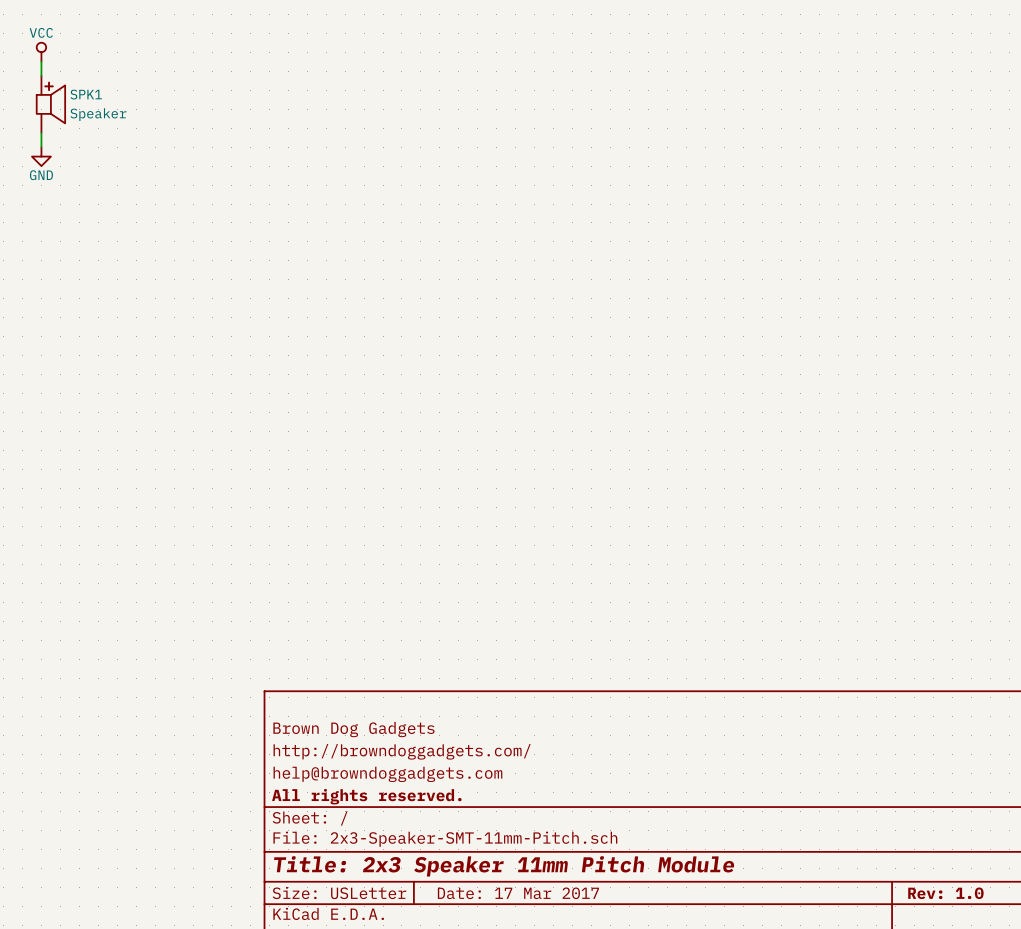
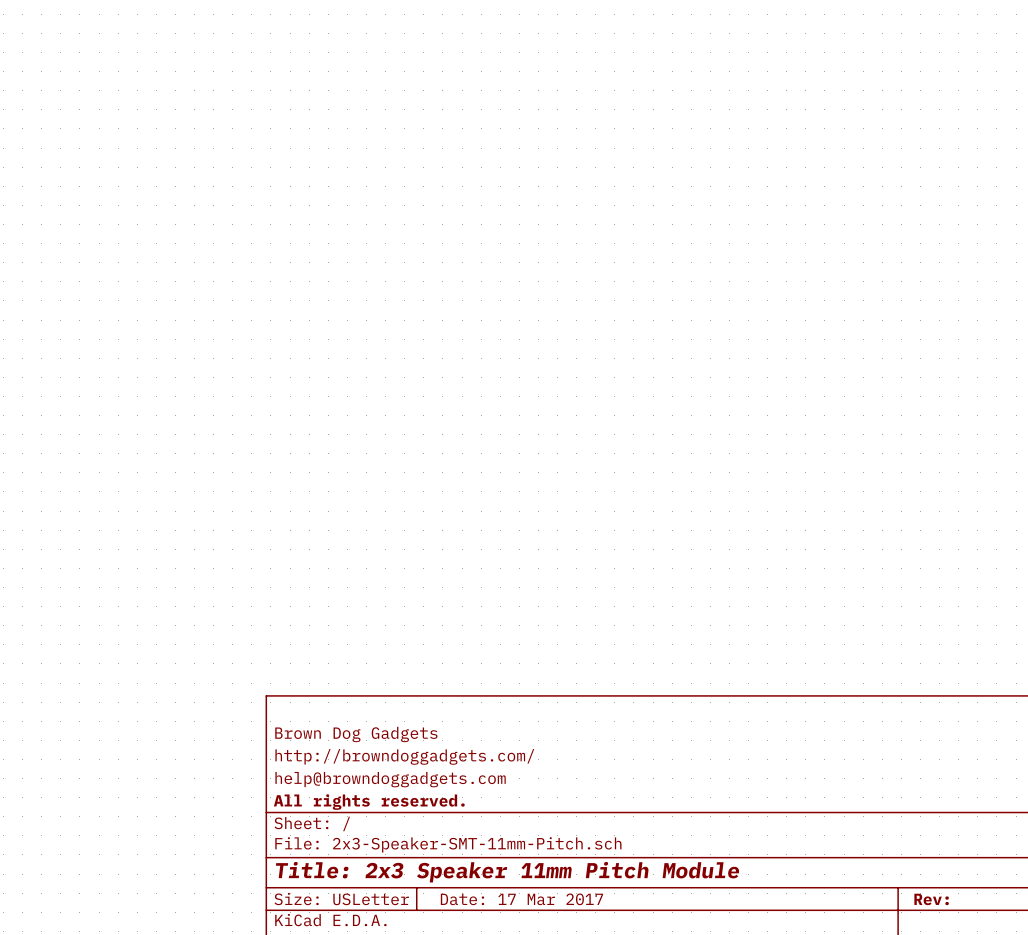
power symbol: VCC (41, 52) -> none
wire: (41, 61) (41, 75) -> none
SPK1: Speaker (50, 104) -> none
wire: (41, 132) (41, 147) -> none
power symbol: GND (41, 156) -> none
title block: Rev: 1.0 (945, 893) -> Rev: (931, 899)

